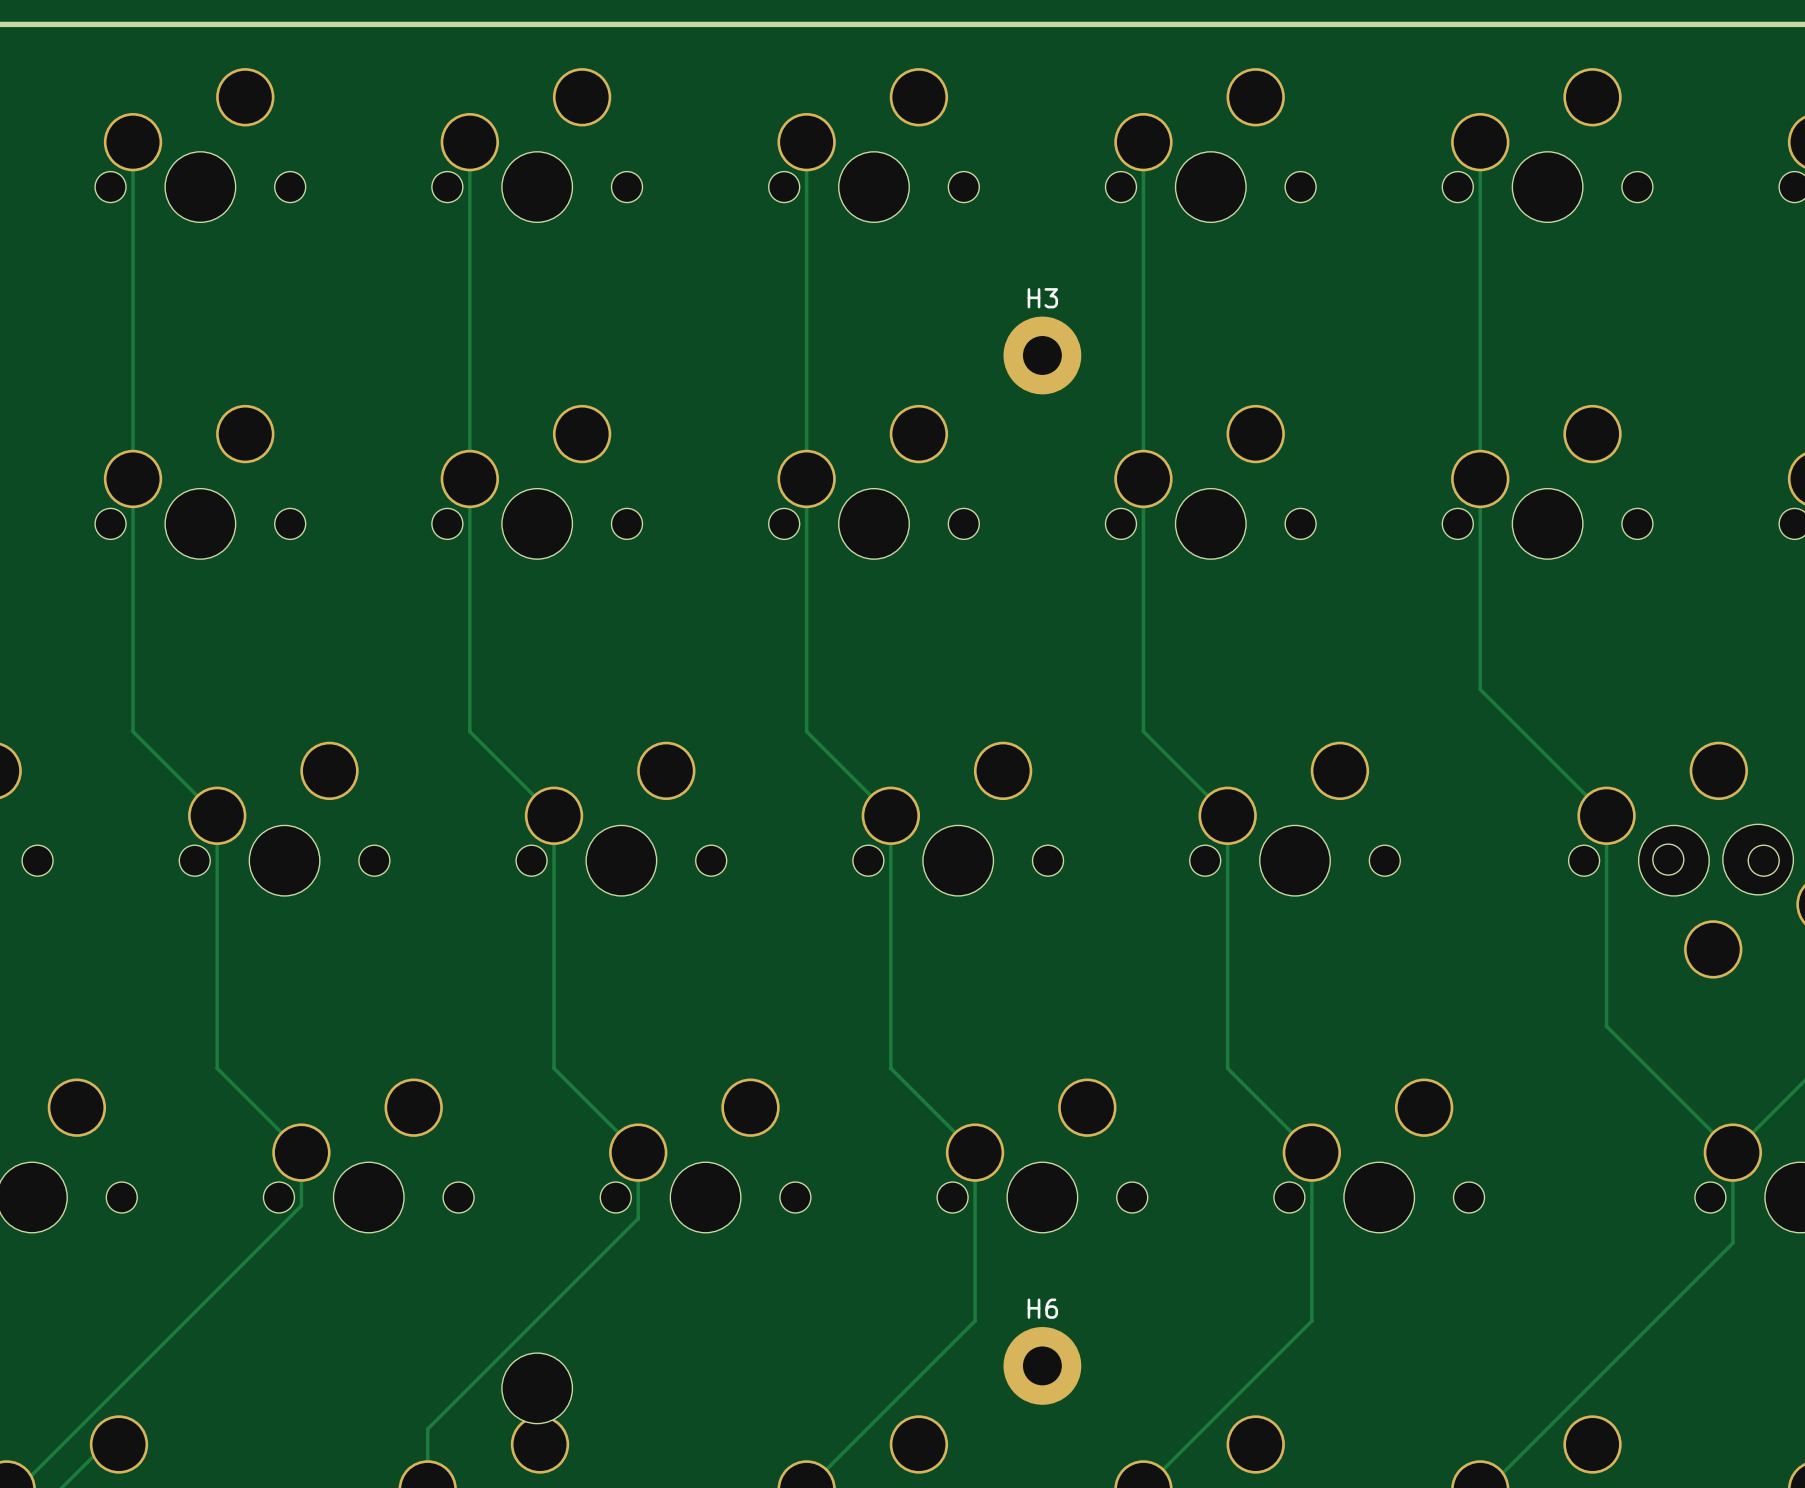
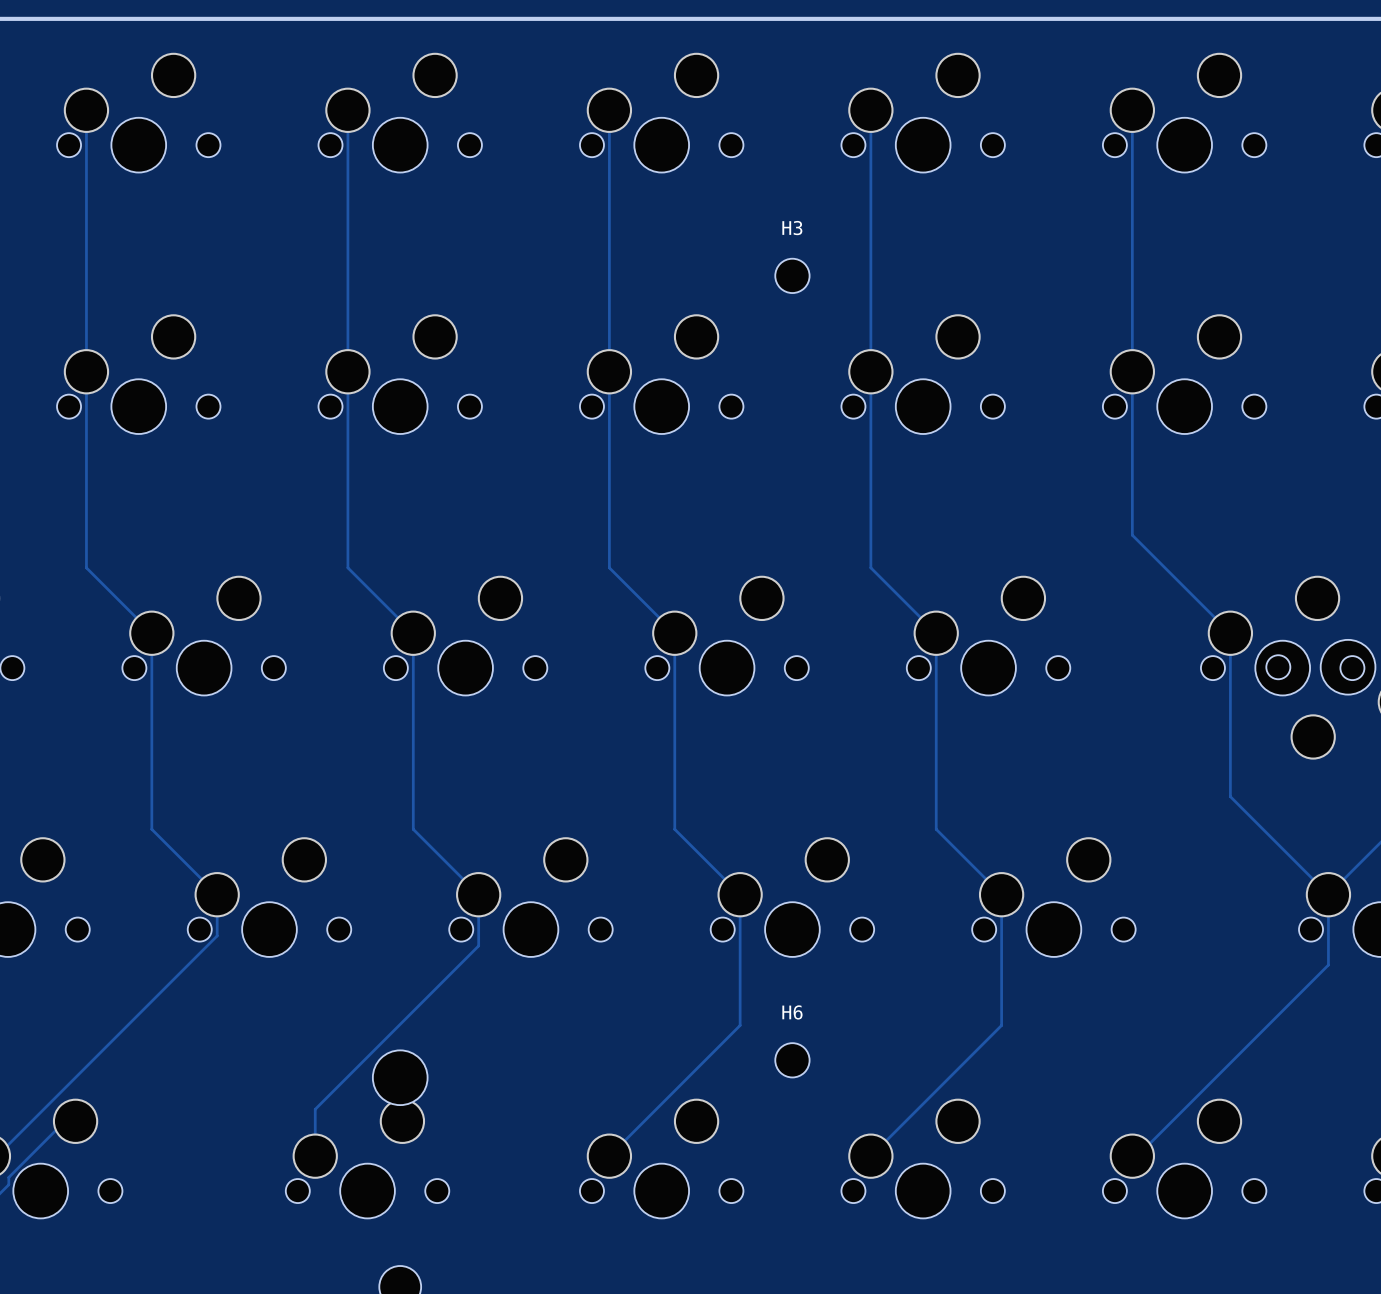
H3 footprint: [1003, 316, 1082, 395] -> [775, 258, 810, 294]
H6 footprint: [1003, 1327, 1082, 1405] -> [775, 1043, 810, 1078]

